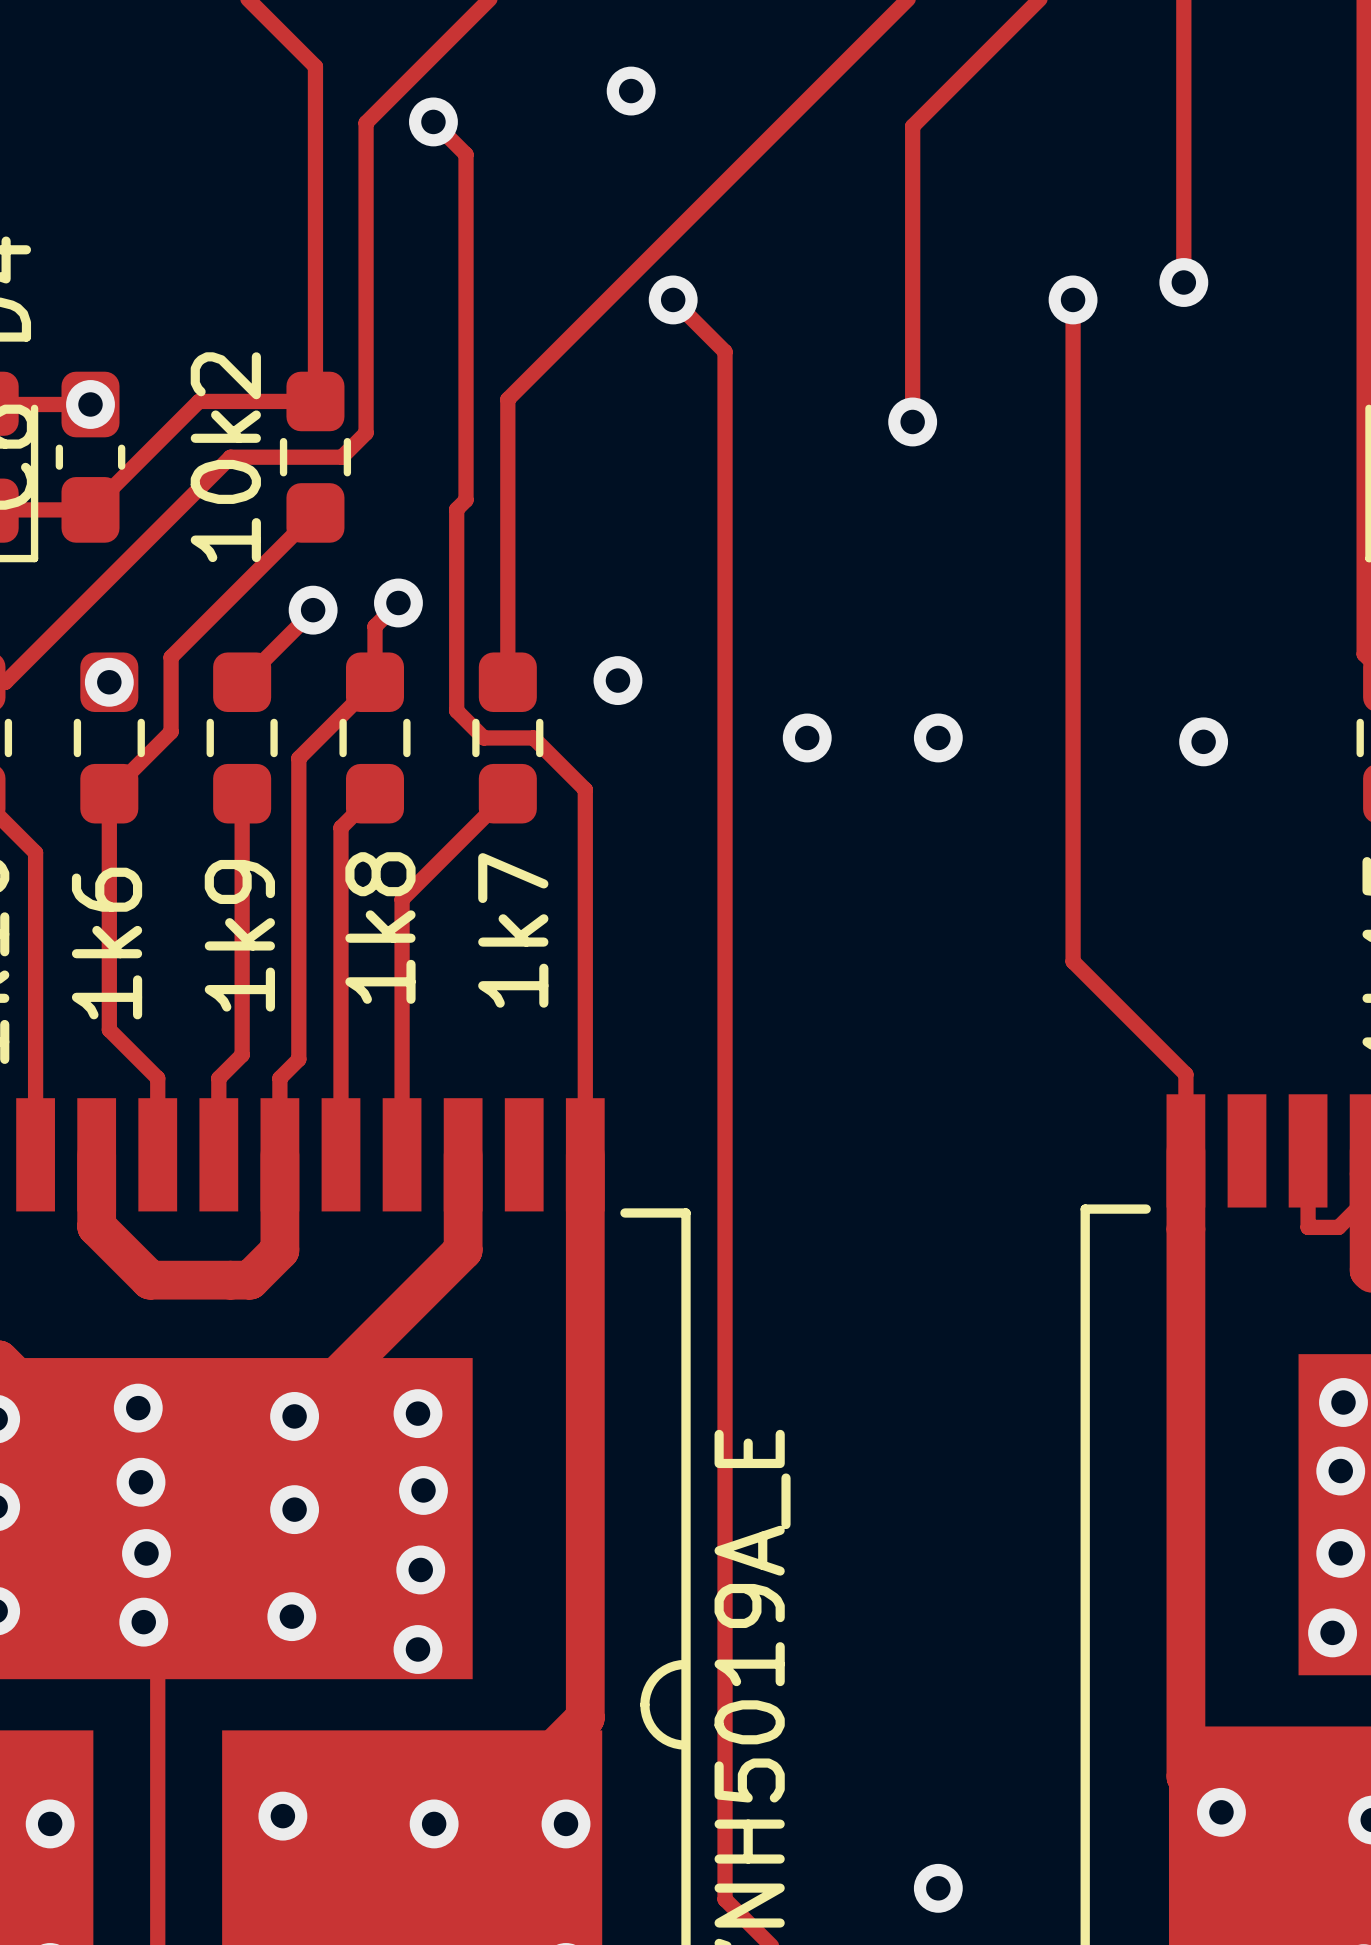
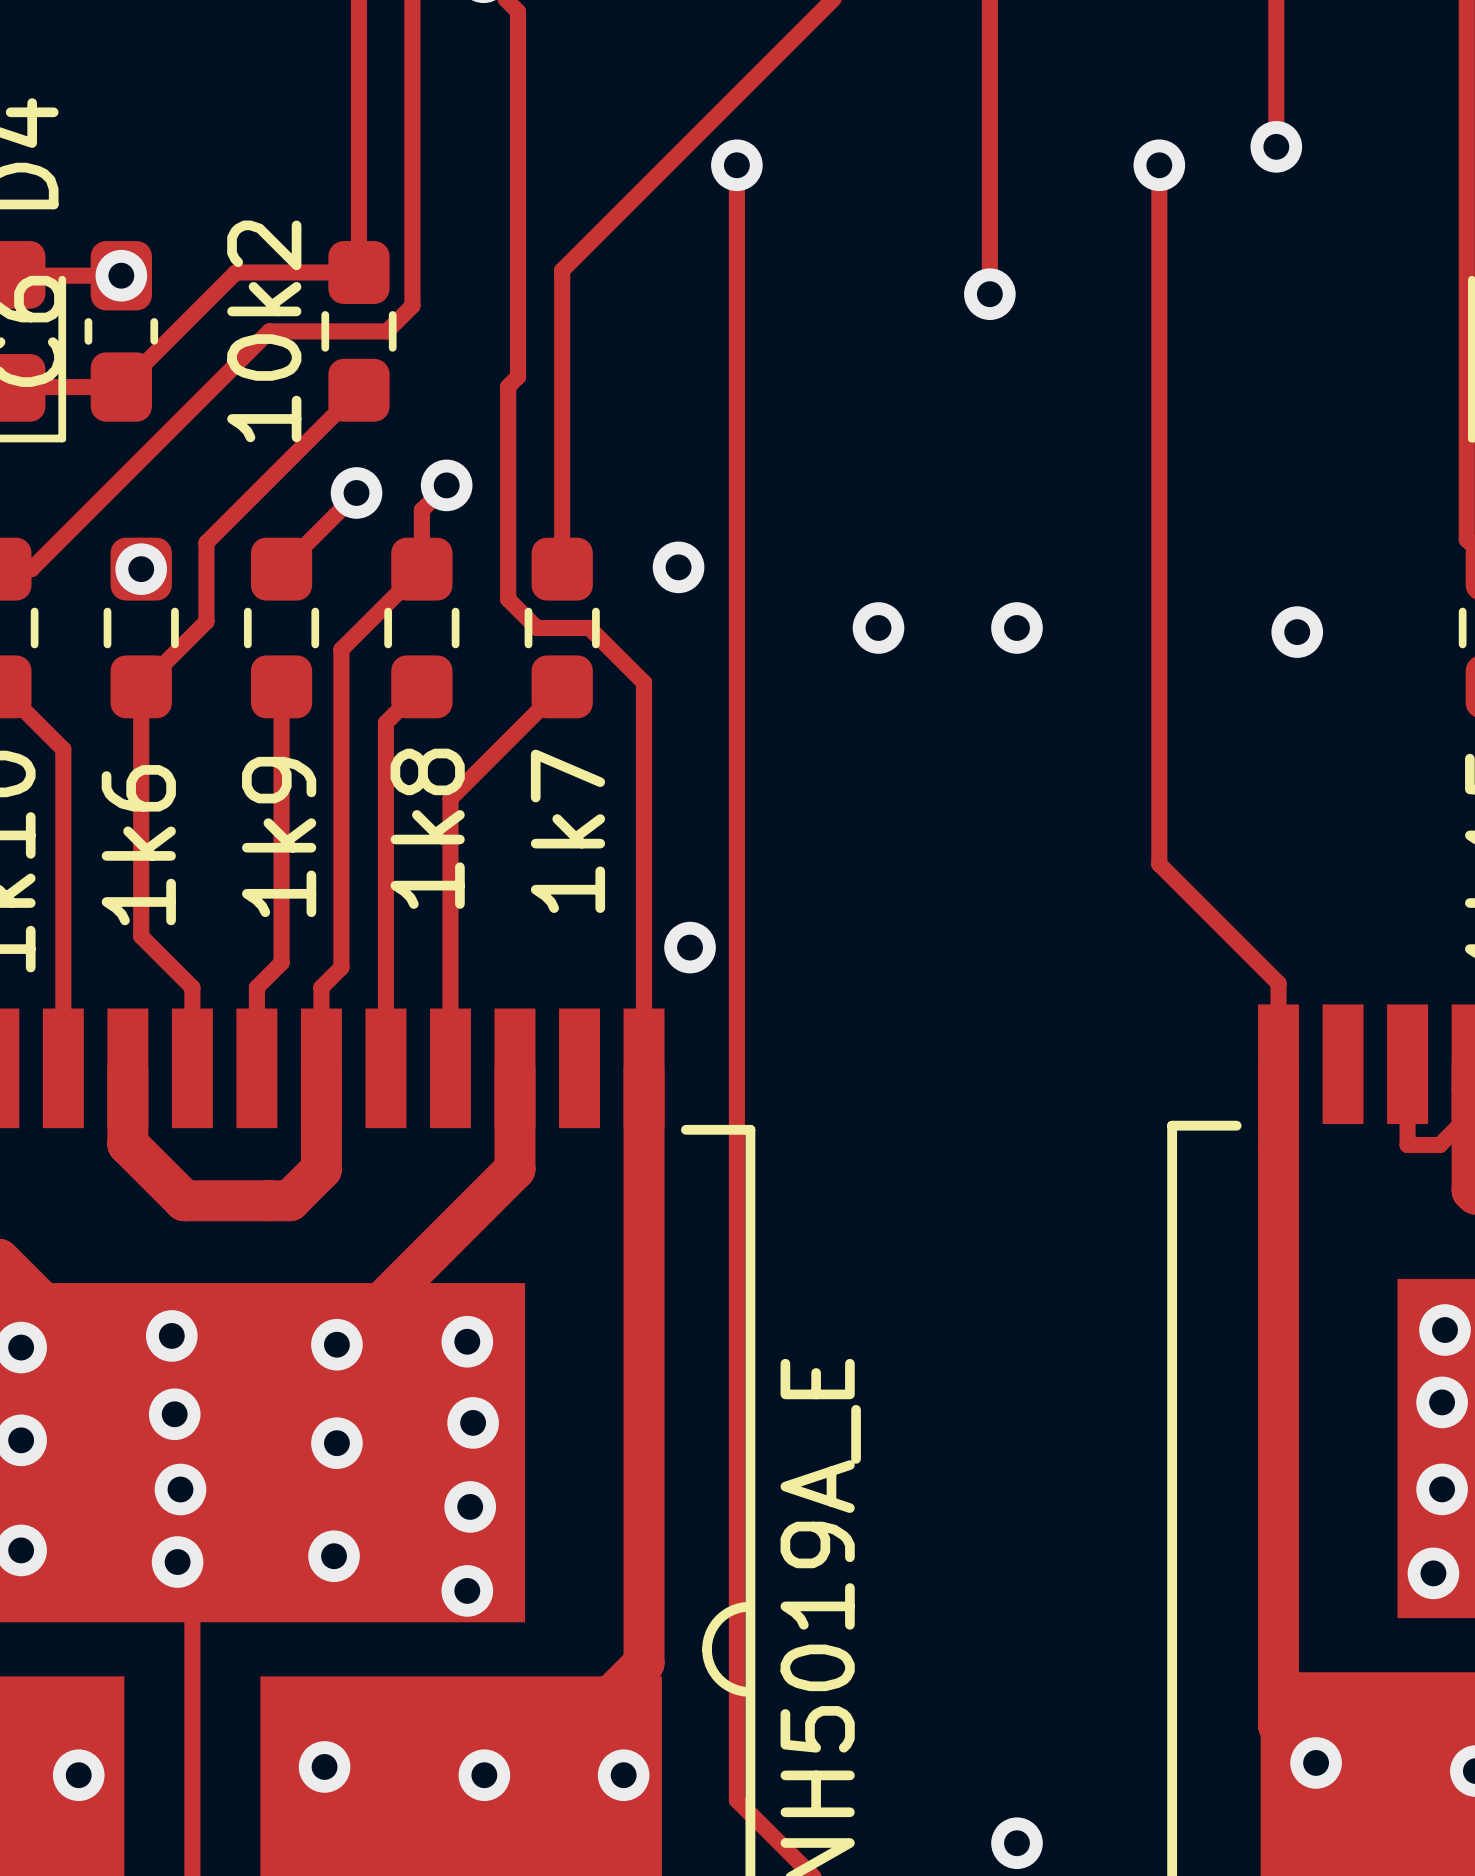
track: (673, 299) (725, 351) (725, 1899) -> (736, 165) (736, 1800) (791, 1854)
via: none -> (690, 947)

